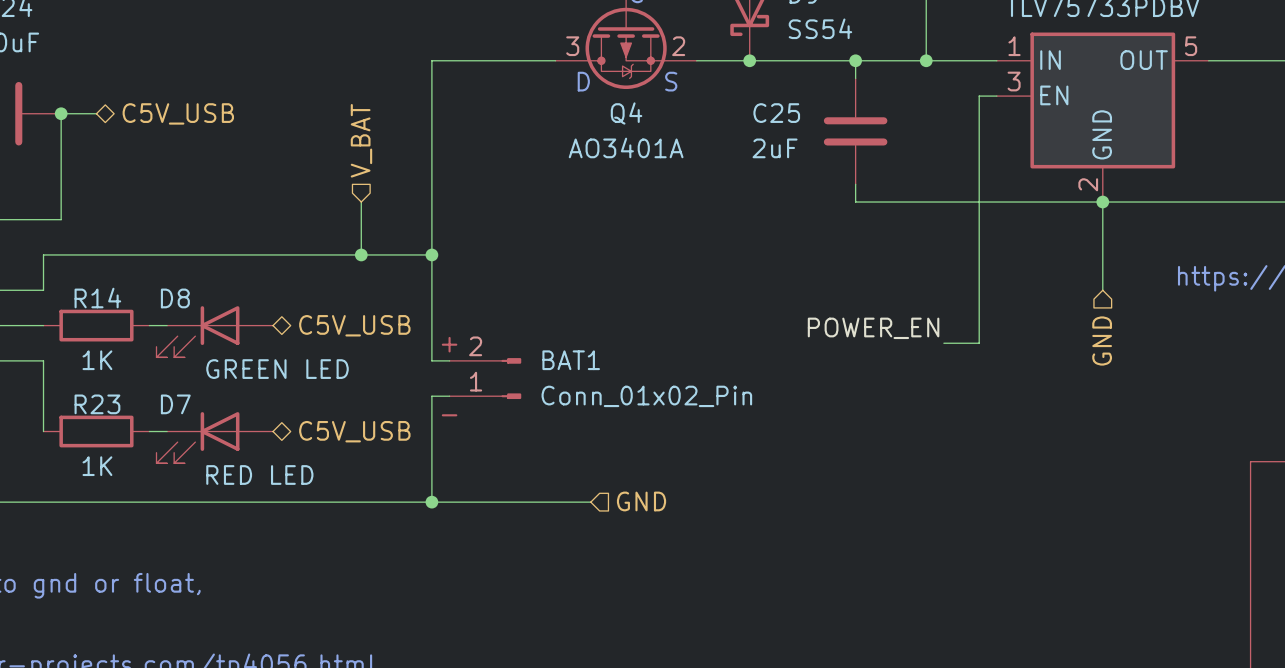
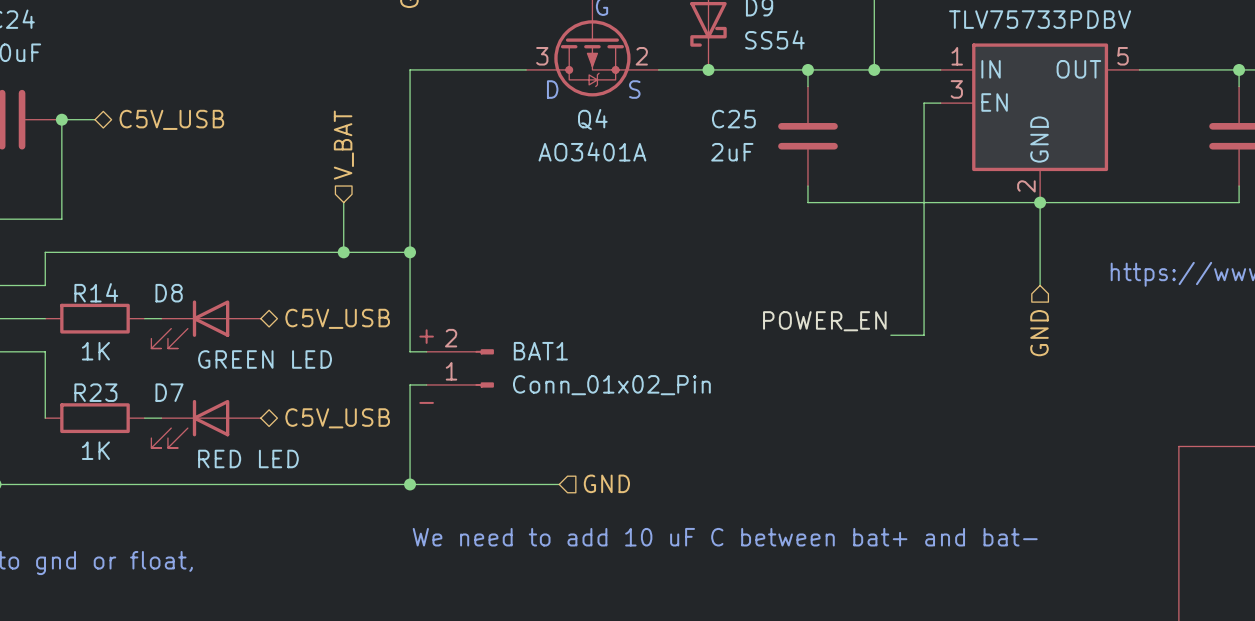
text: none -> We need to add 10 uF C between bat+ and bat- (725, 537)

